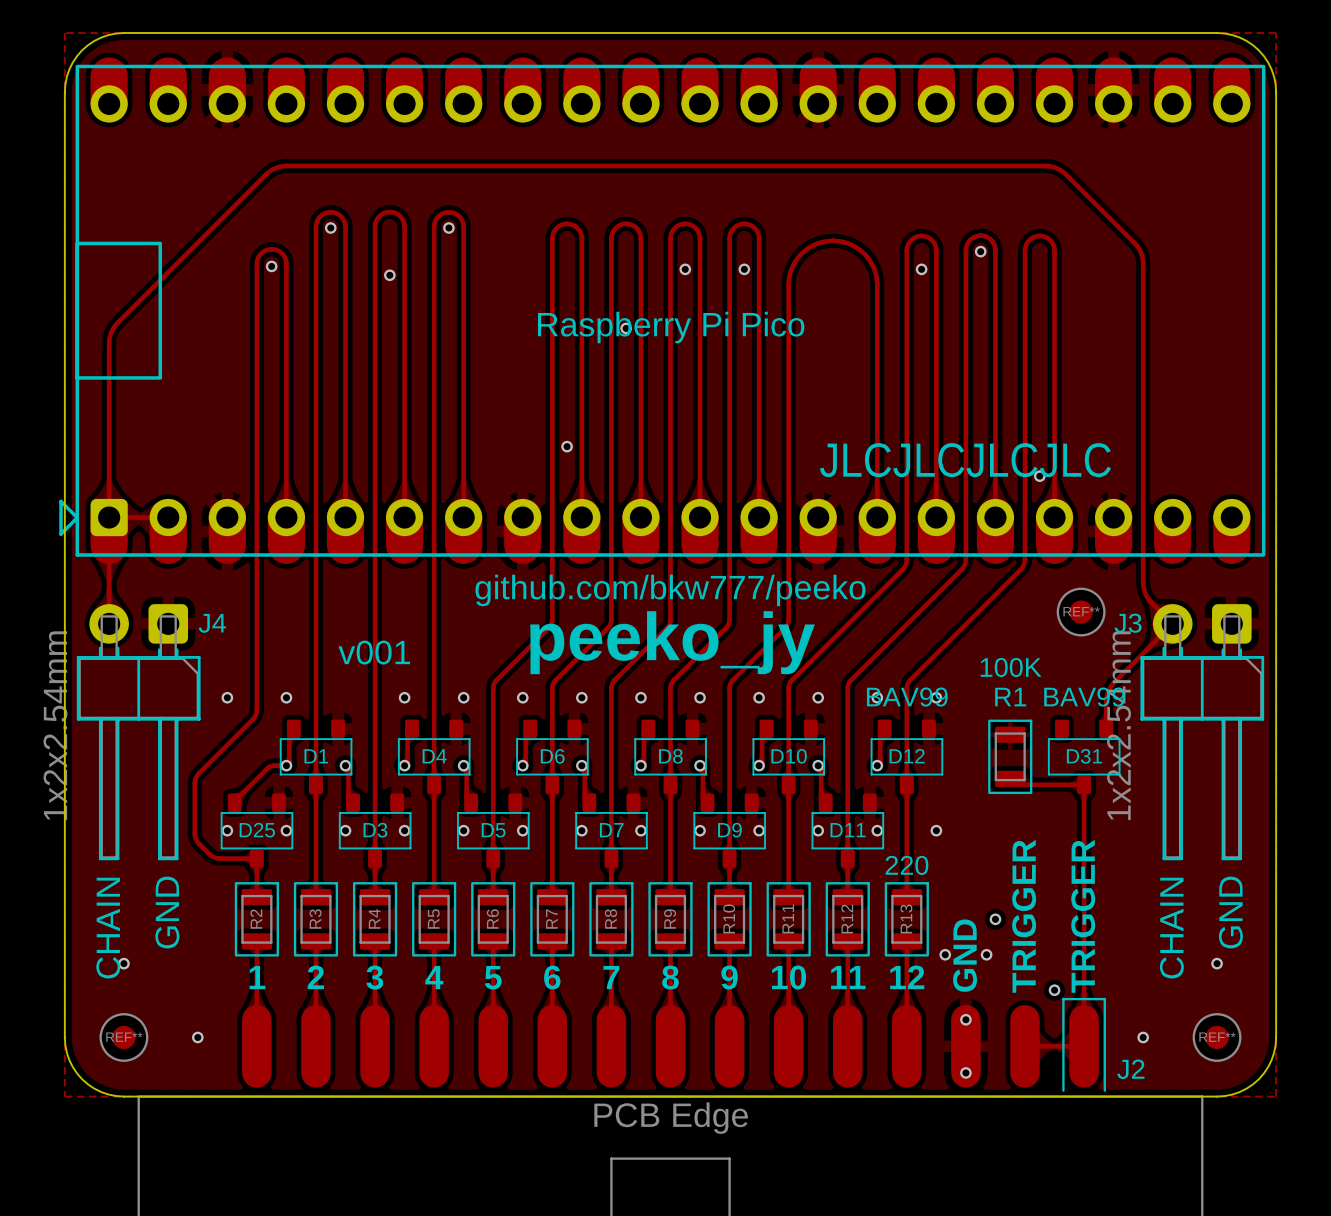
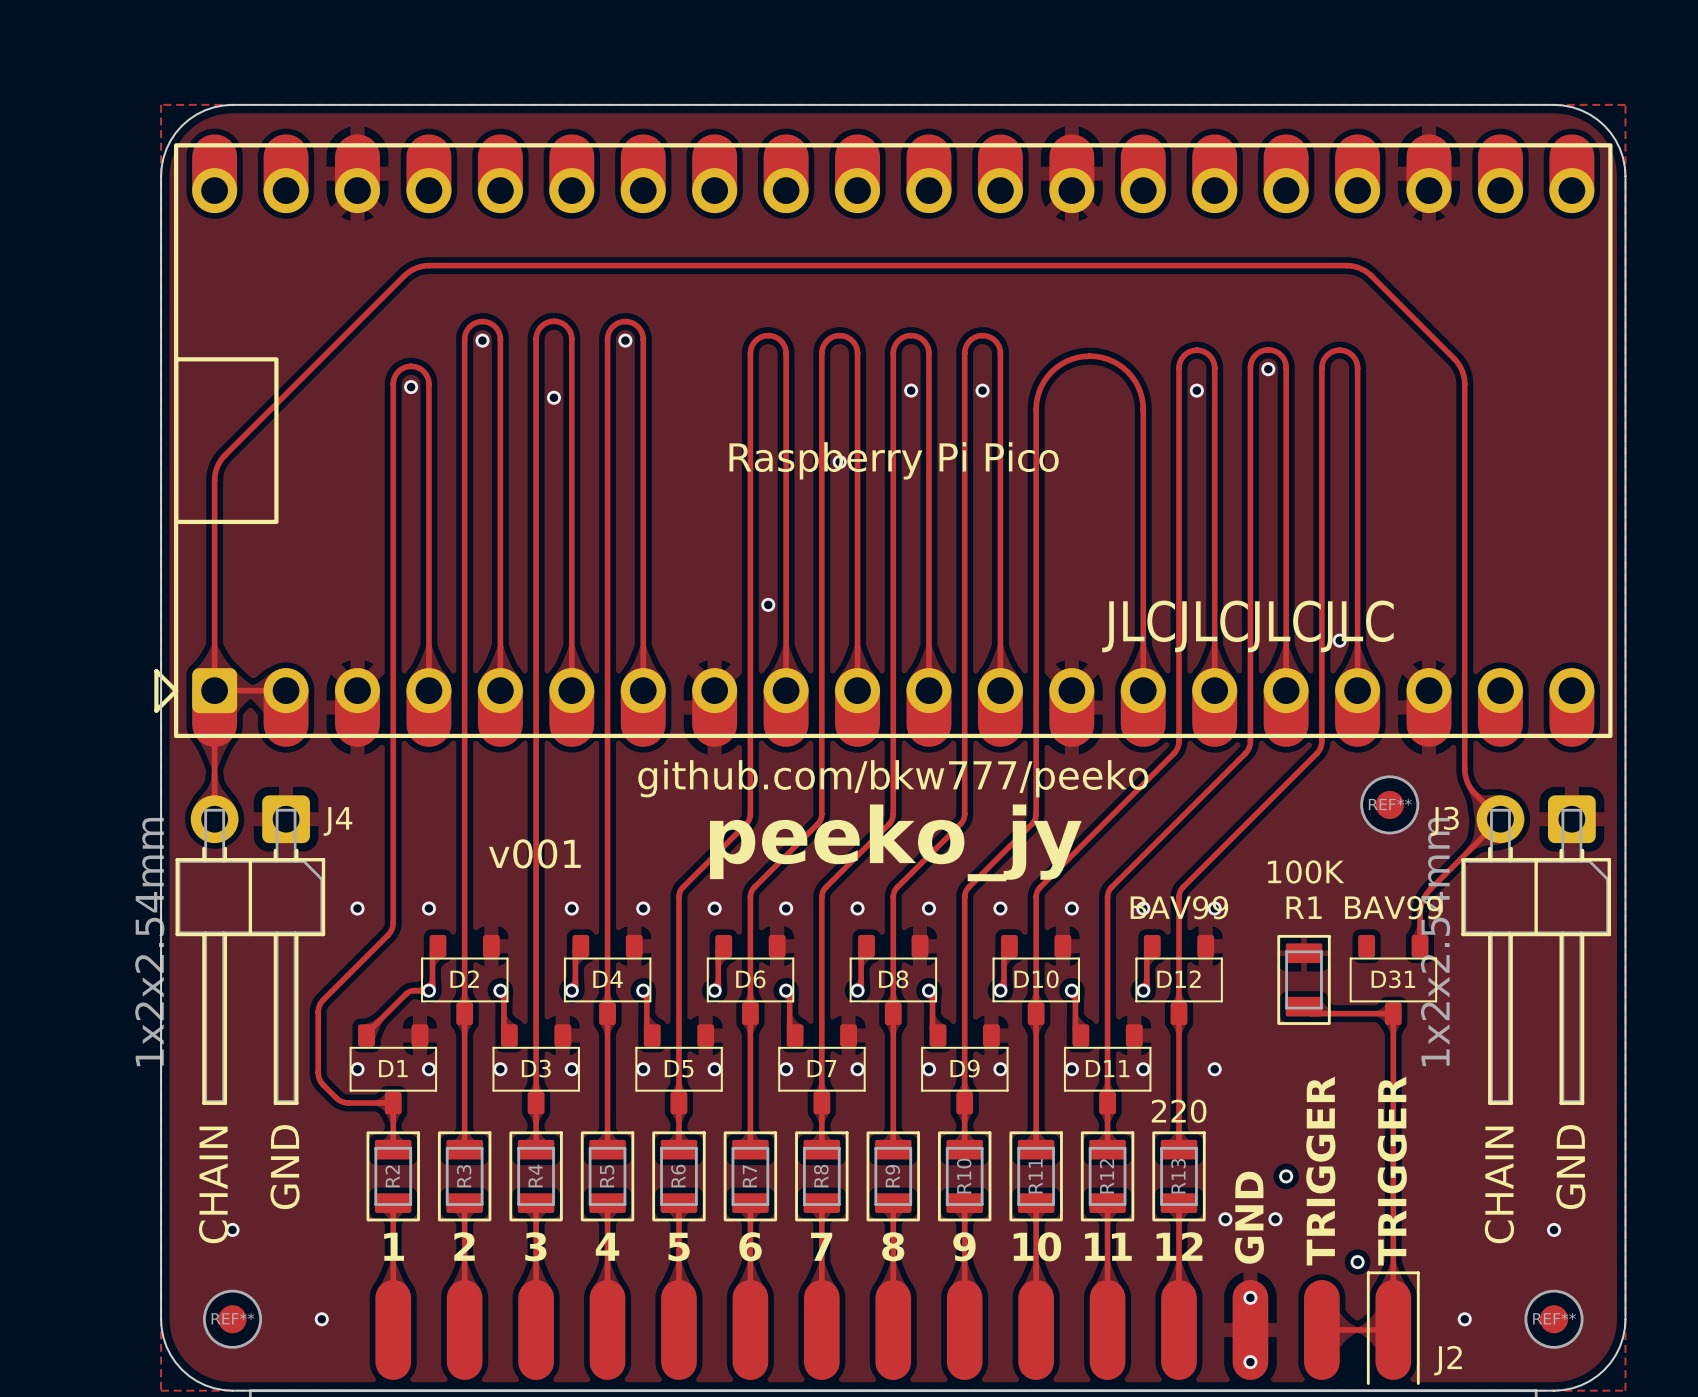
D1 name: D1 (316, 756) -> D2 (464, 979)
D25 name: D25 (257, 830) -> D1 (393, 1068)

